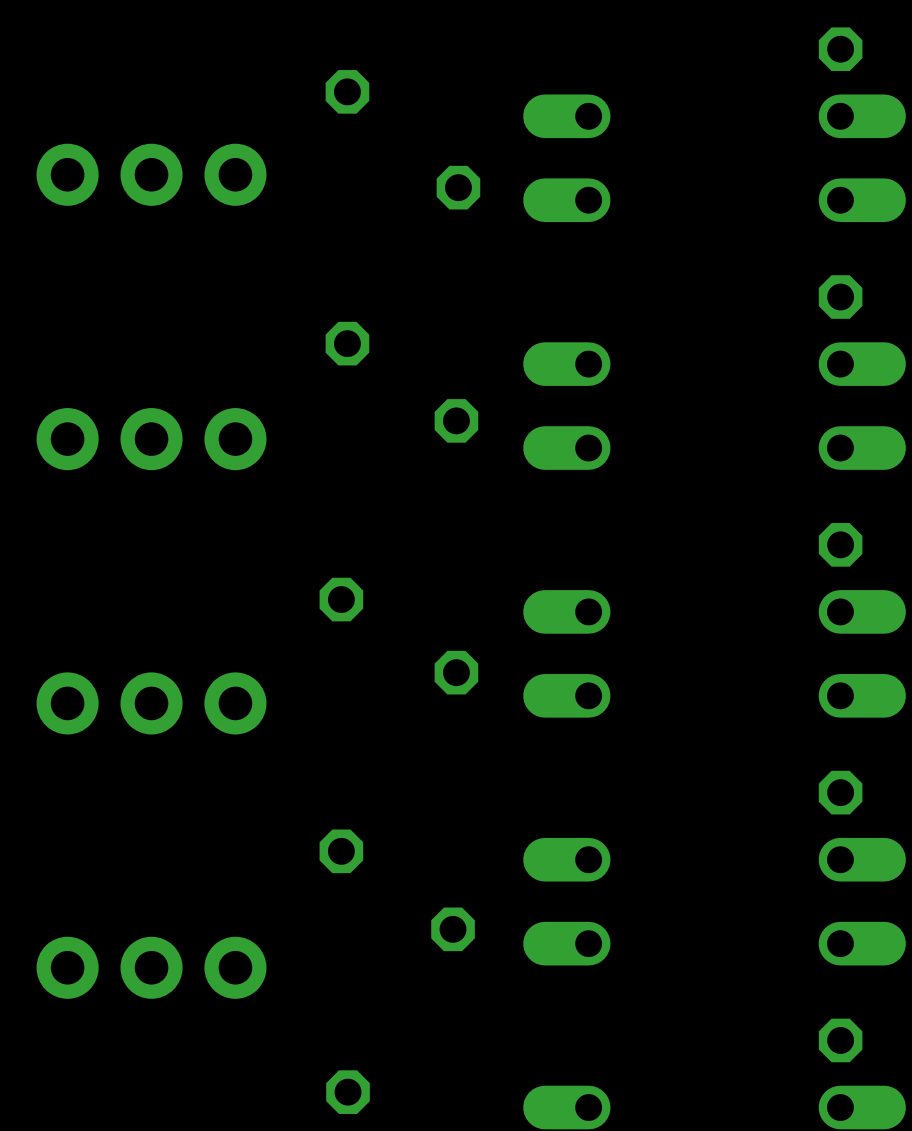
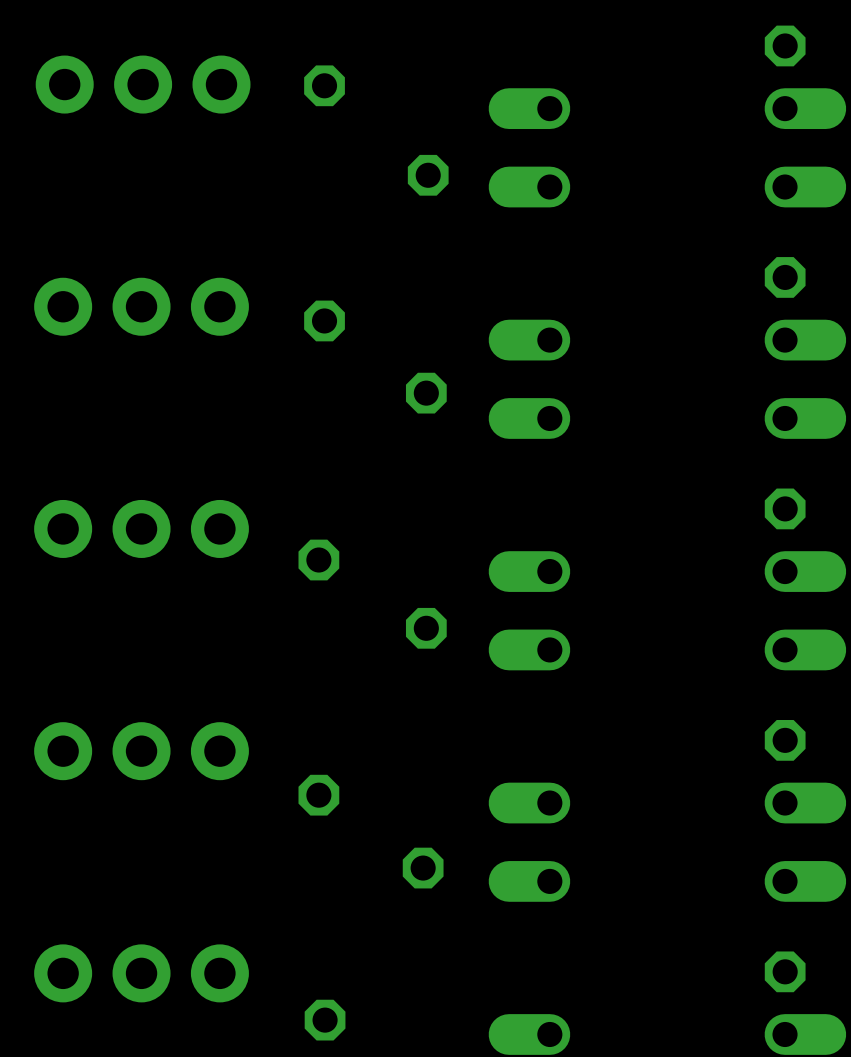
part: none -> (143, 84)
part: (151, 174) -> none
part: none -> (141, 306)
part: (151, 439) -> none
part: none -> (141, 528)
part: (151, 703) -> none
part: none -> (141, 751)
part position: (151, 967) -> (141, 973)

